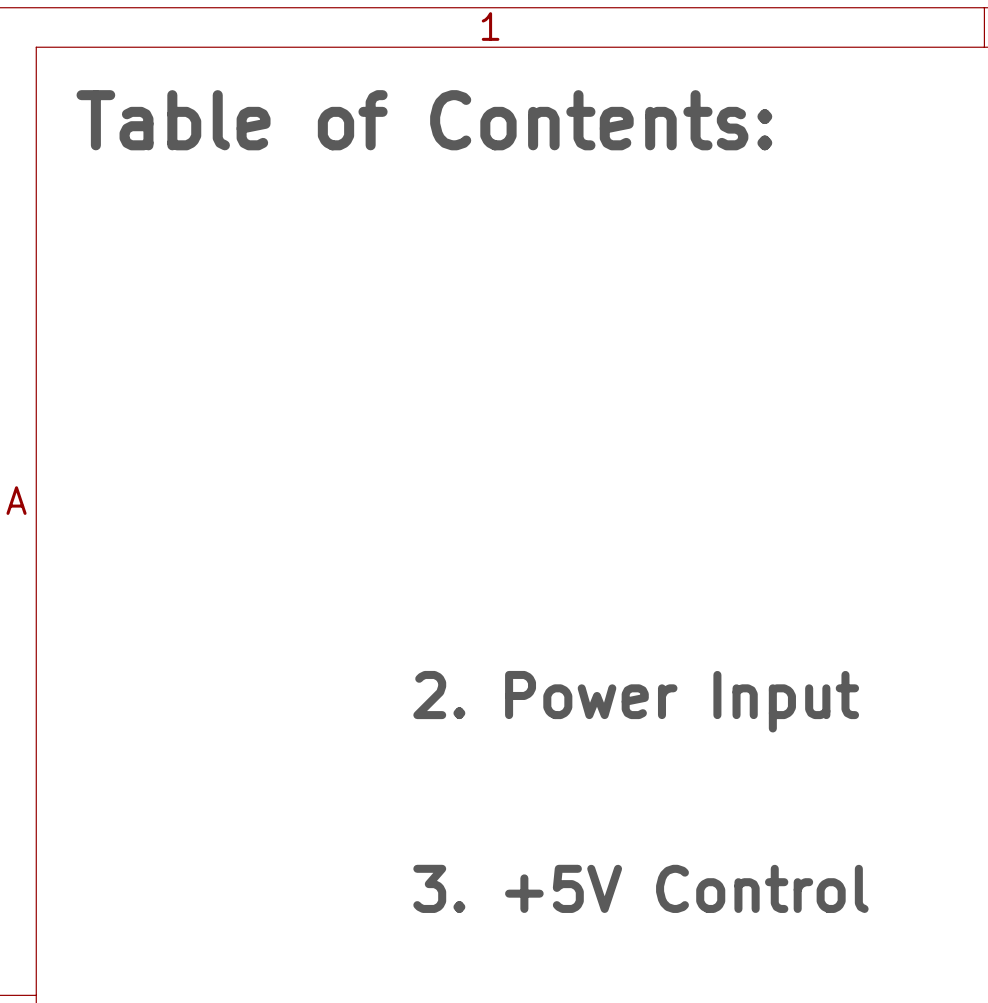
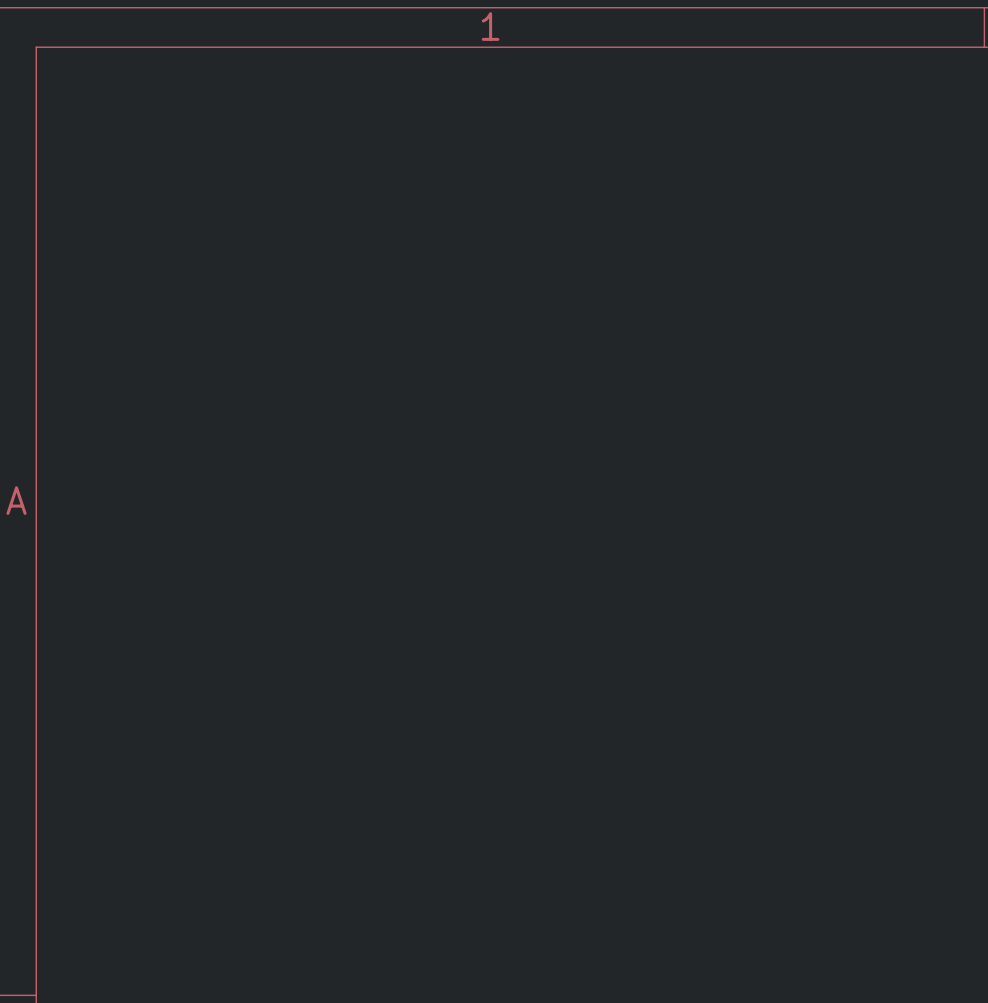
text: Table of Contents: (424, 120) -> none
text: 2. Power Input (636, 701) -> none
text: 3. +5V Control (640, 888) -> none

